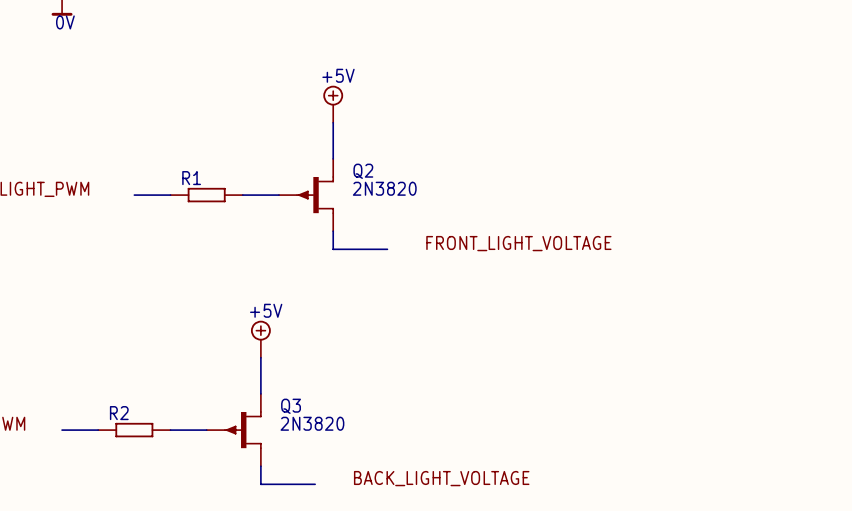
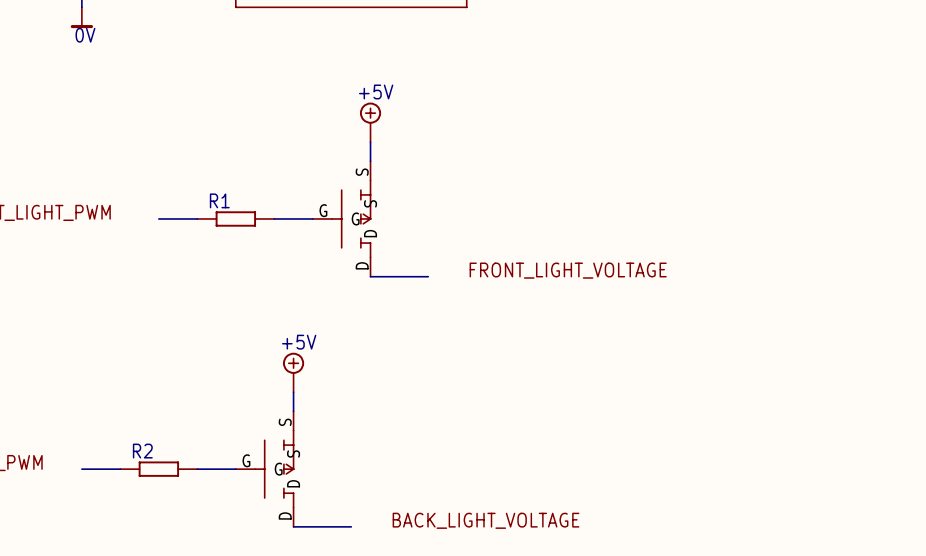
Q2: 2N3820 (306, 195) -> none
part: none -> (341, 218)
Q3: 2N3820 (234, 430) -> none
part: none -> (264, 469)

